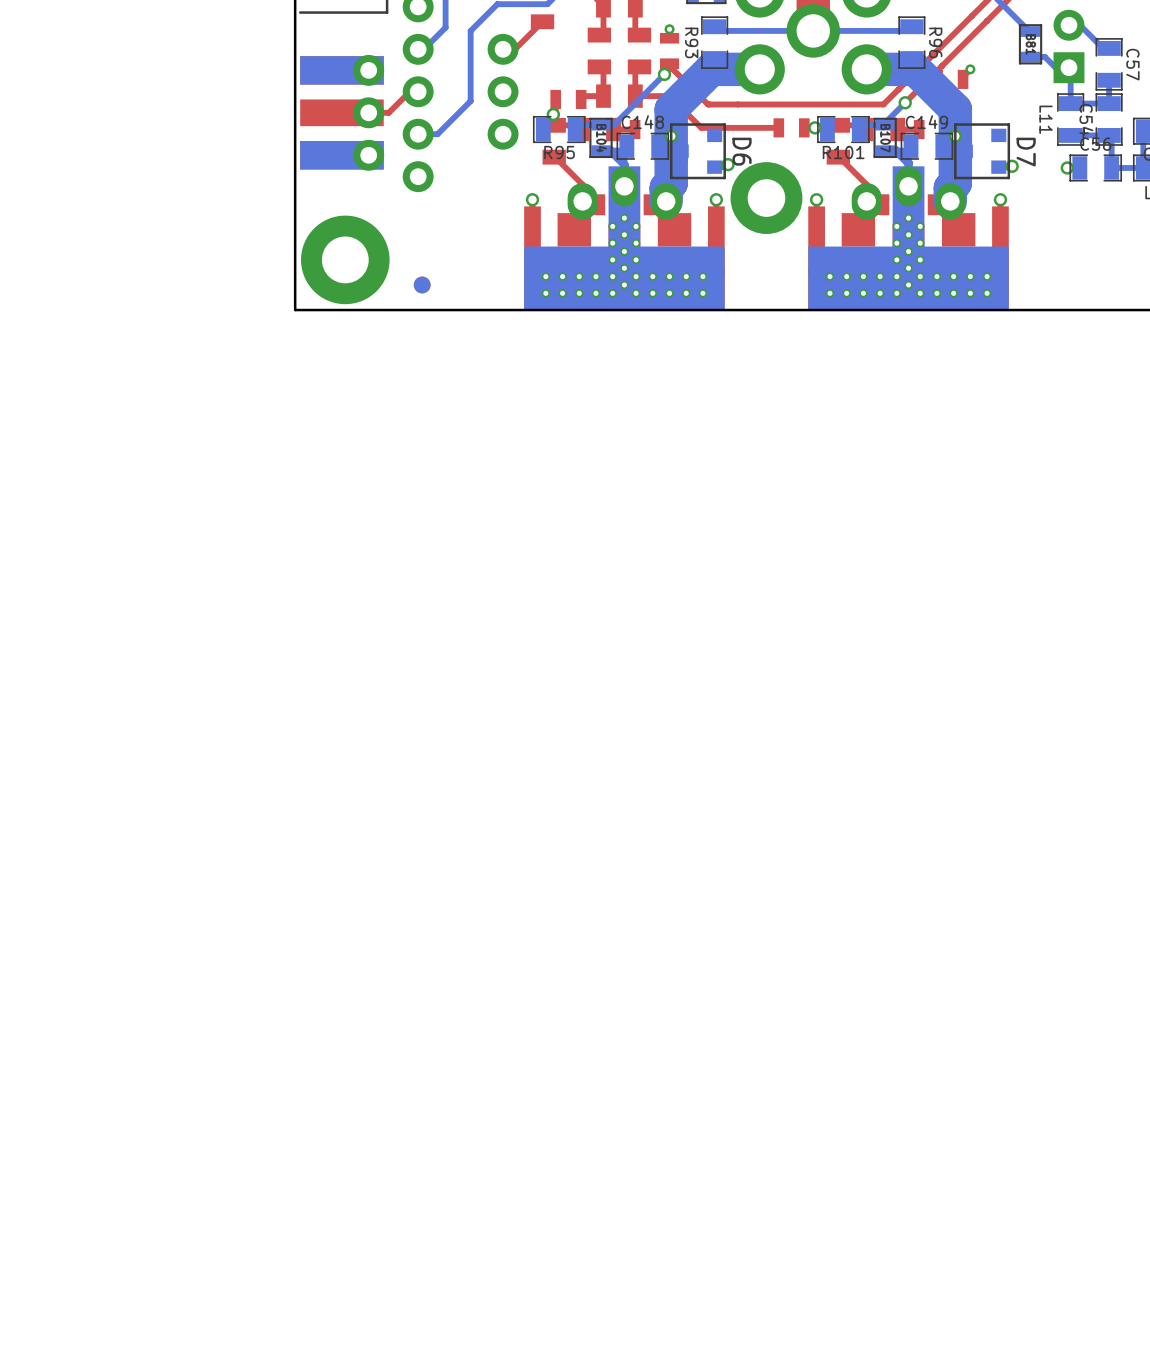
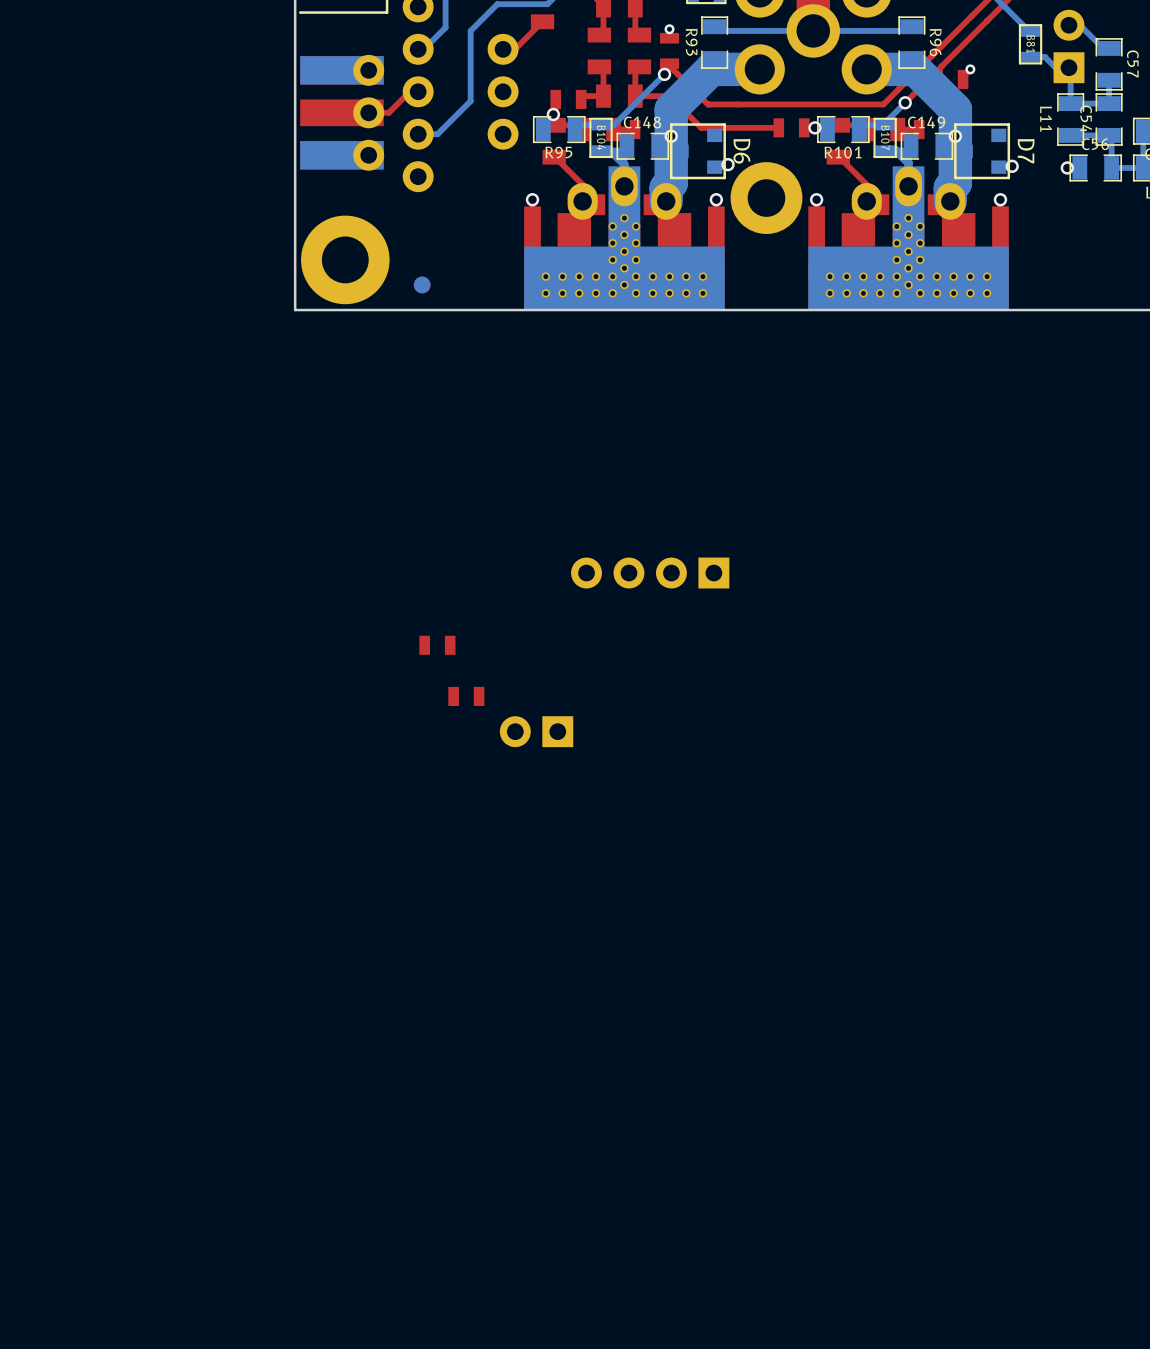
part: none -> (650, 573)
part: none -> (437, 645)
part: none -> (466, 696)
part: none -> (536, 731)

